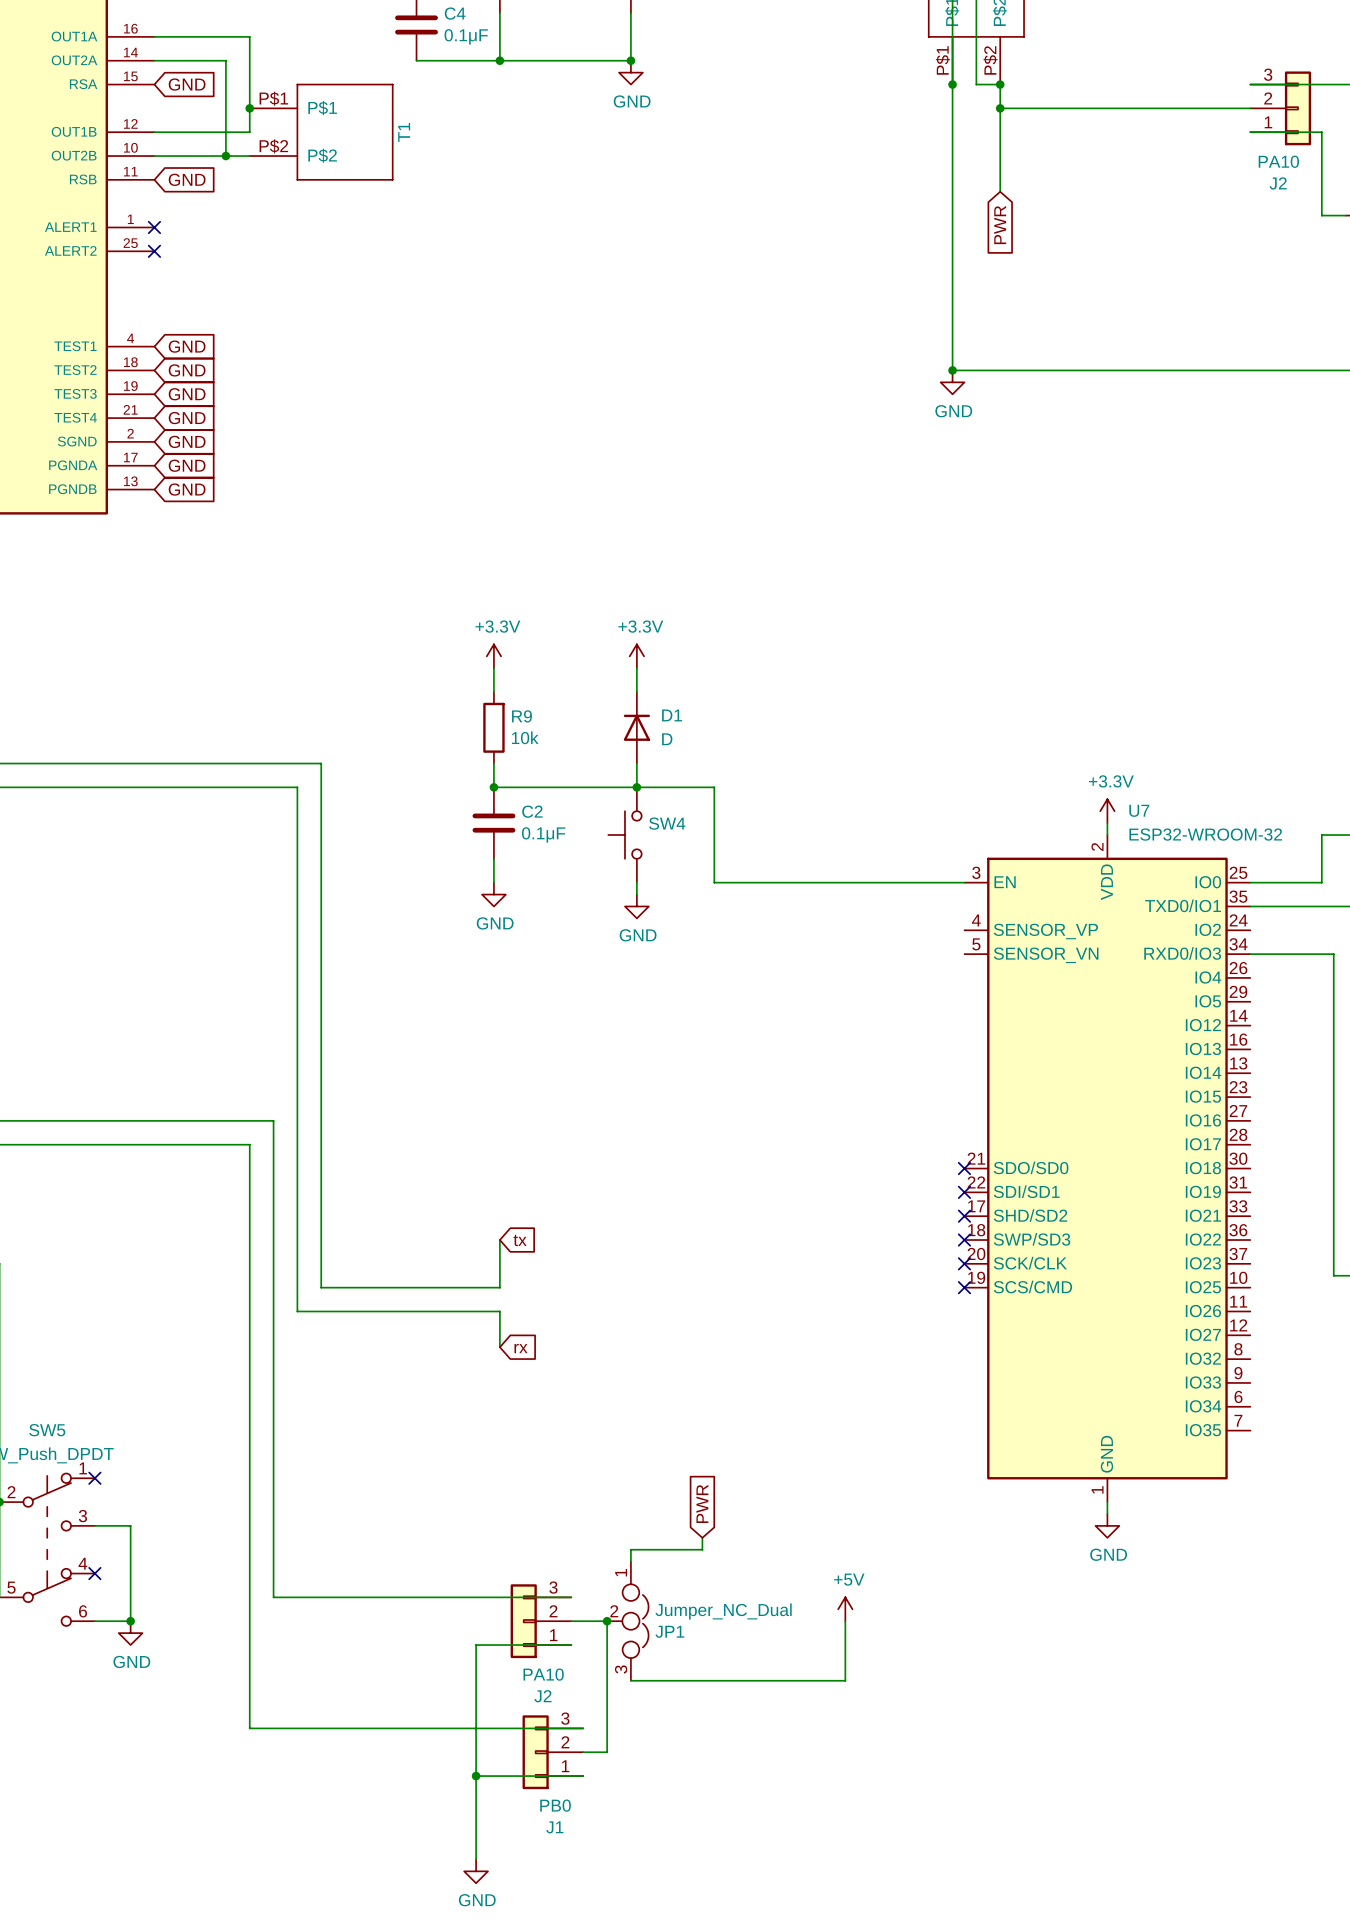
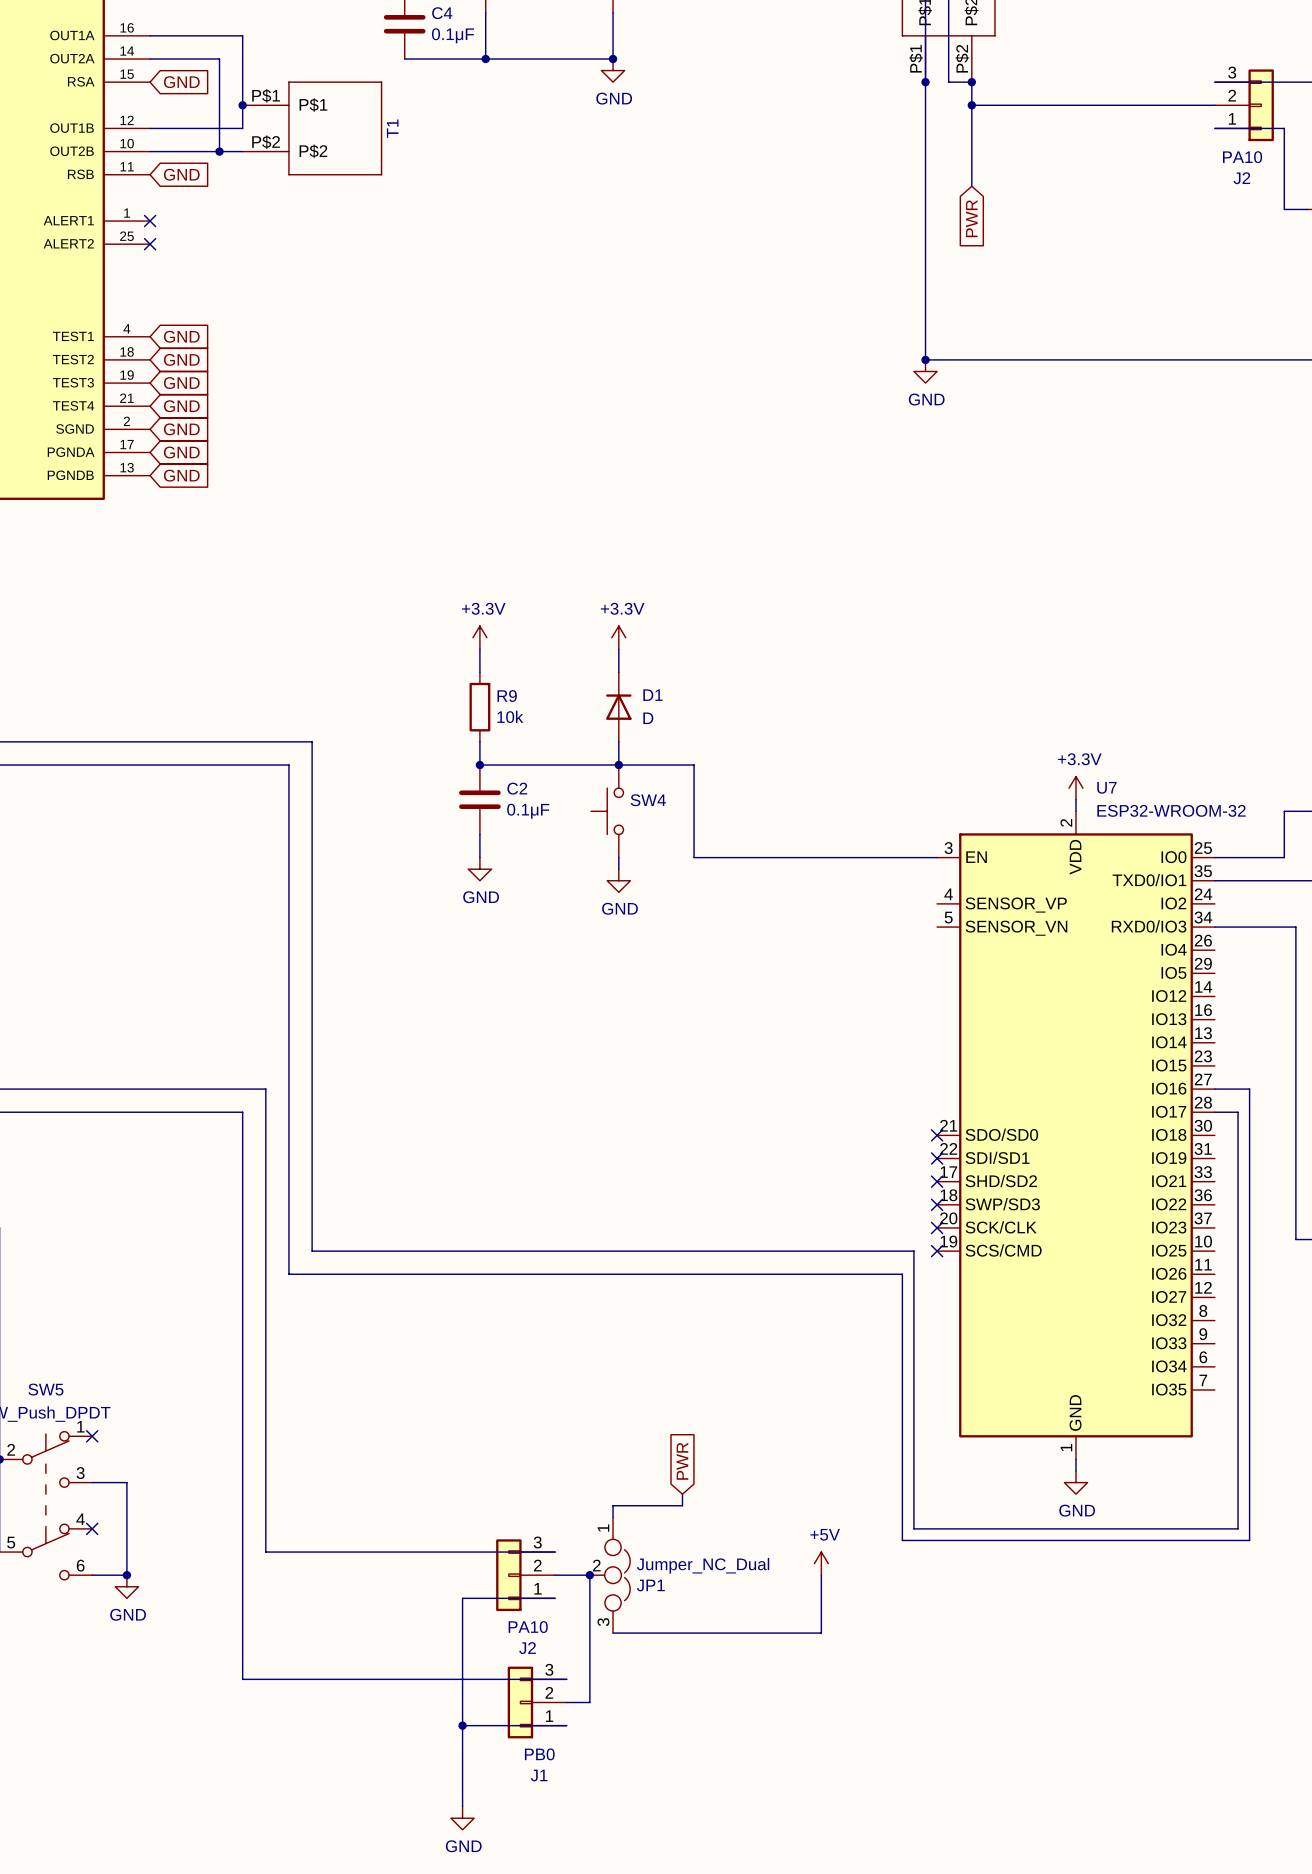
wire: (499, 1240) (499, 1287) -> (1214, 1112) (1238, 1112) (1238, 1528) (913, 1528) (913, 1251) (485, 1251)
global label: tx (520, 1240) -> none
wire: (499, 1311) (499, 1347) -> (485, 1274) (902, 1274) (902, 1540) (1249, 1540) (1249, 1089) (1214, 1089)
global label: rx (520, 1348) -> none

